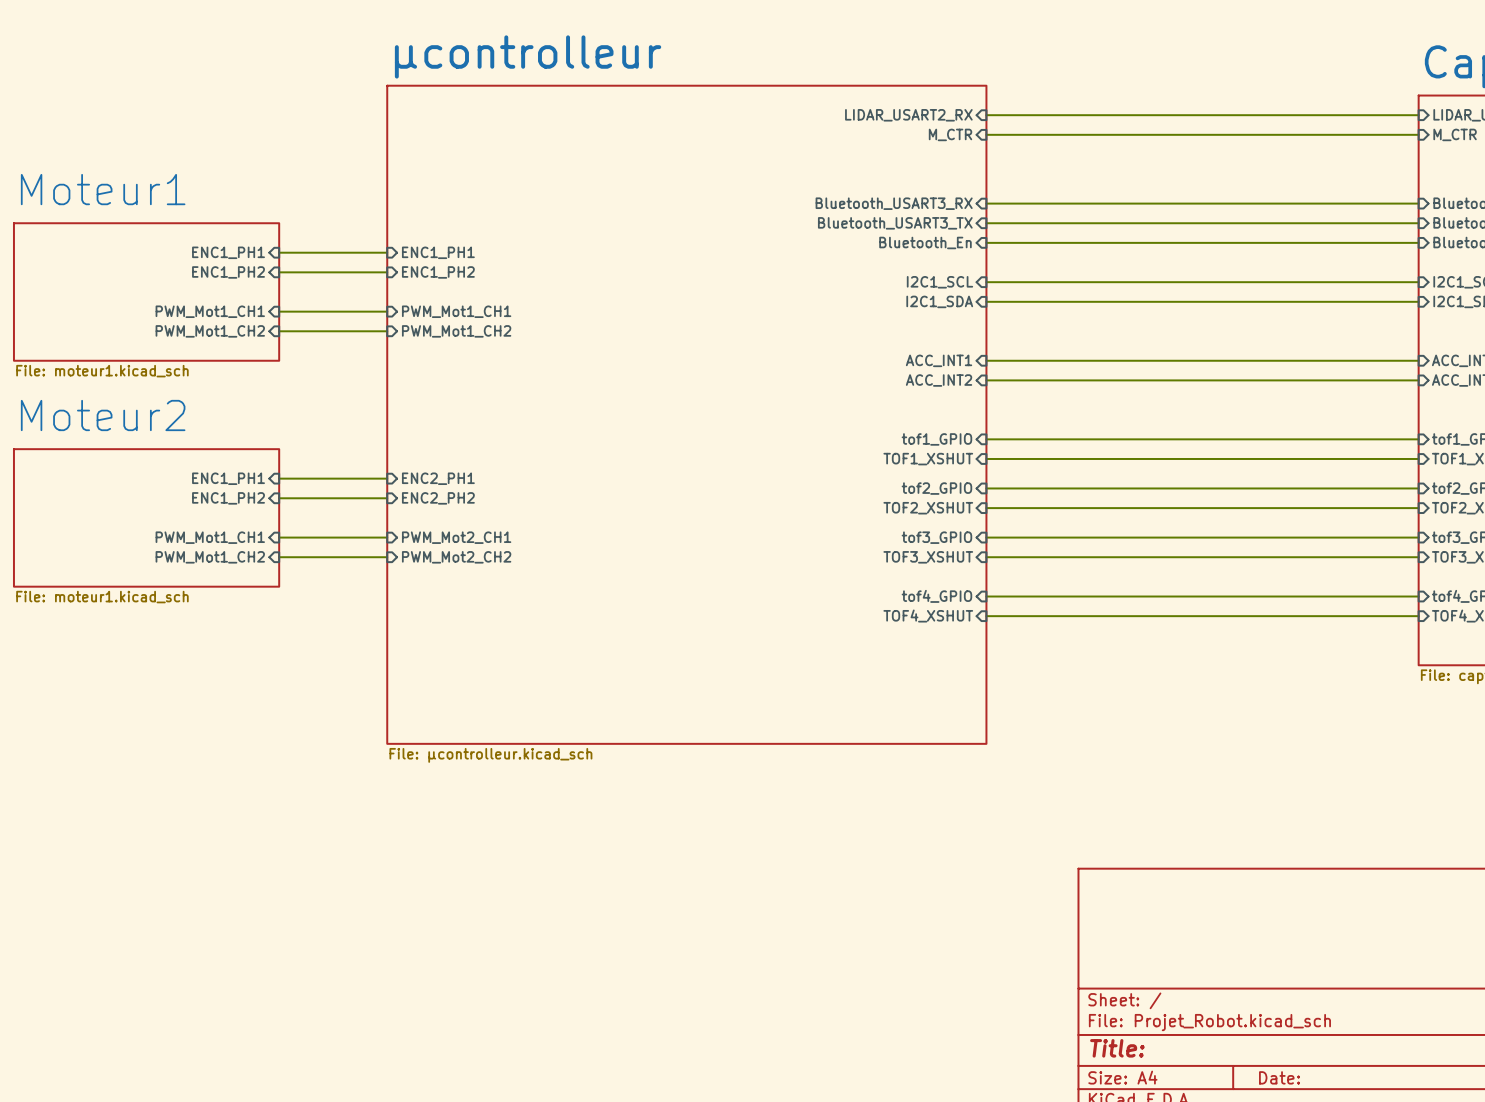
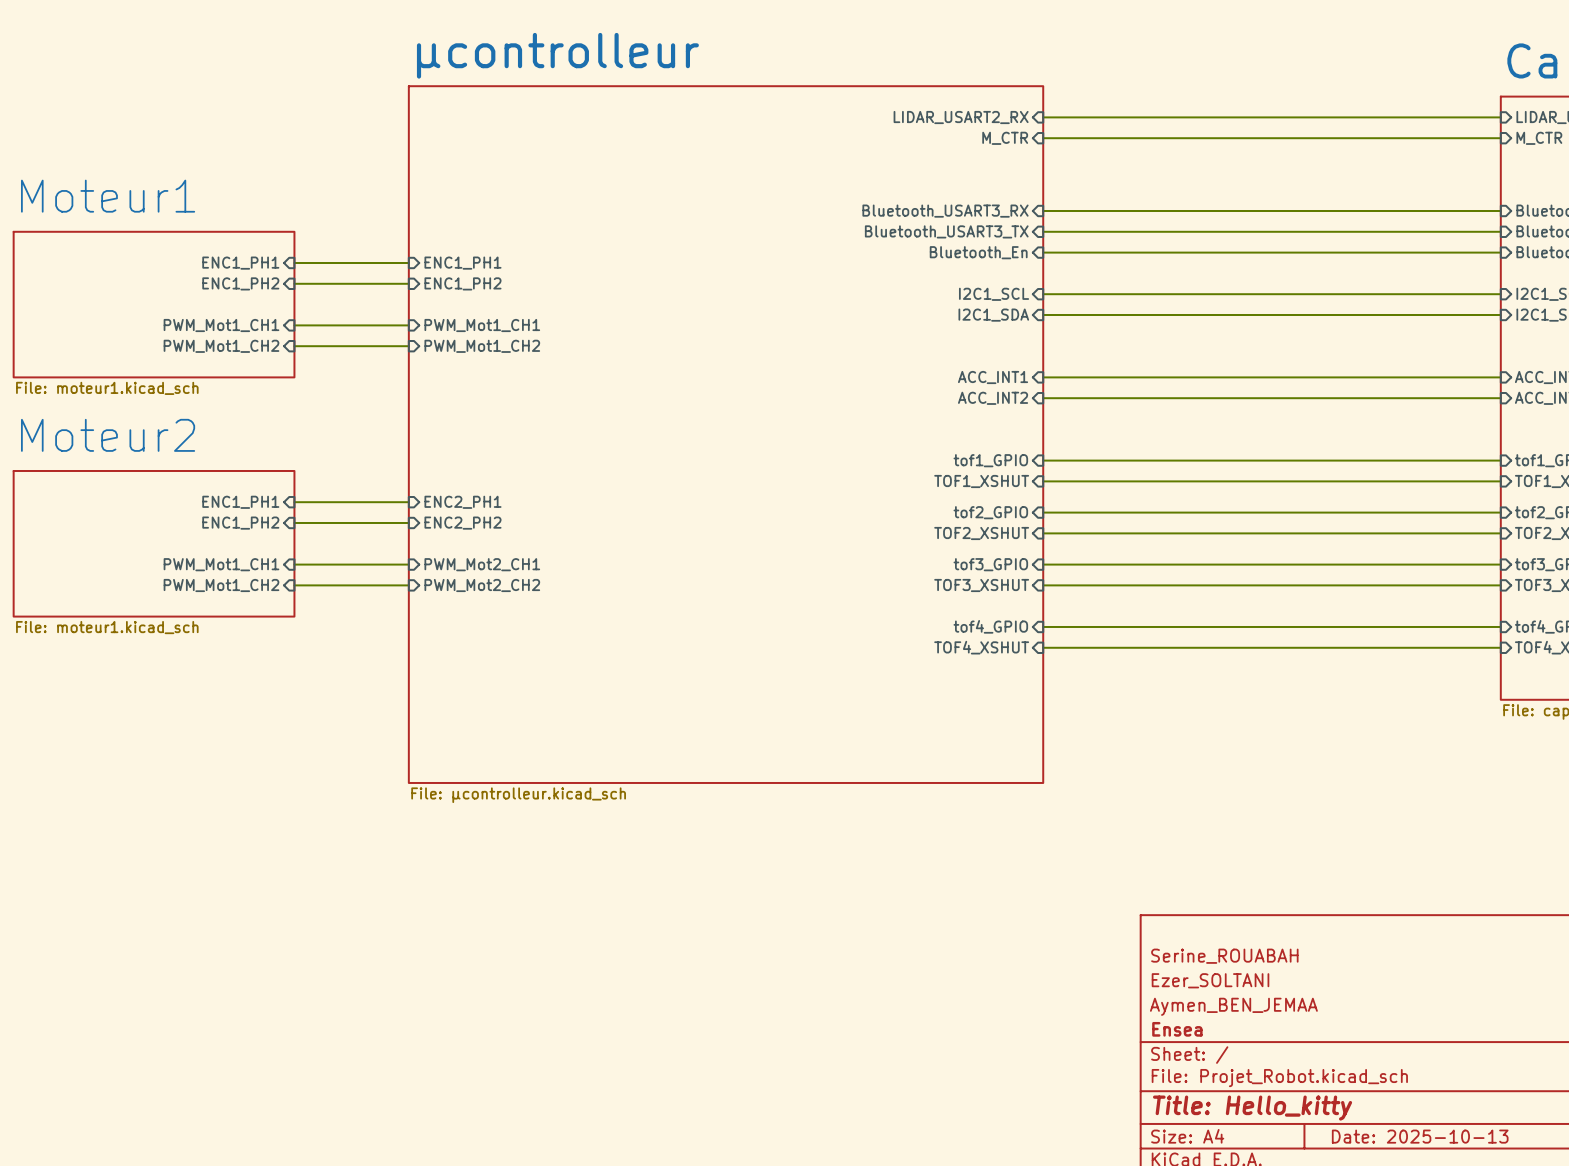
title block: none -> Serine_ROUABAH (1224, 956)
title block: none -> Ezer_SOLTANI (1210, 980)
title block: none -> Aymen_BEN_JEMAA (1233, 1006)
title block: none -> Ensea (1177, 1029)
title block: Title: (1117, 1048) -> Title: Hello_kitty (1252, 1108)
title block: Date: (1279, 1077) -> Date: 2025-10-13 (1420, 1136)

